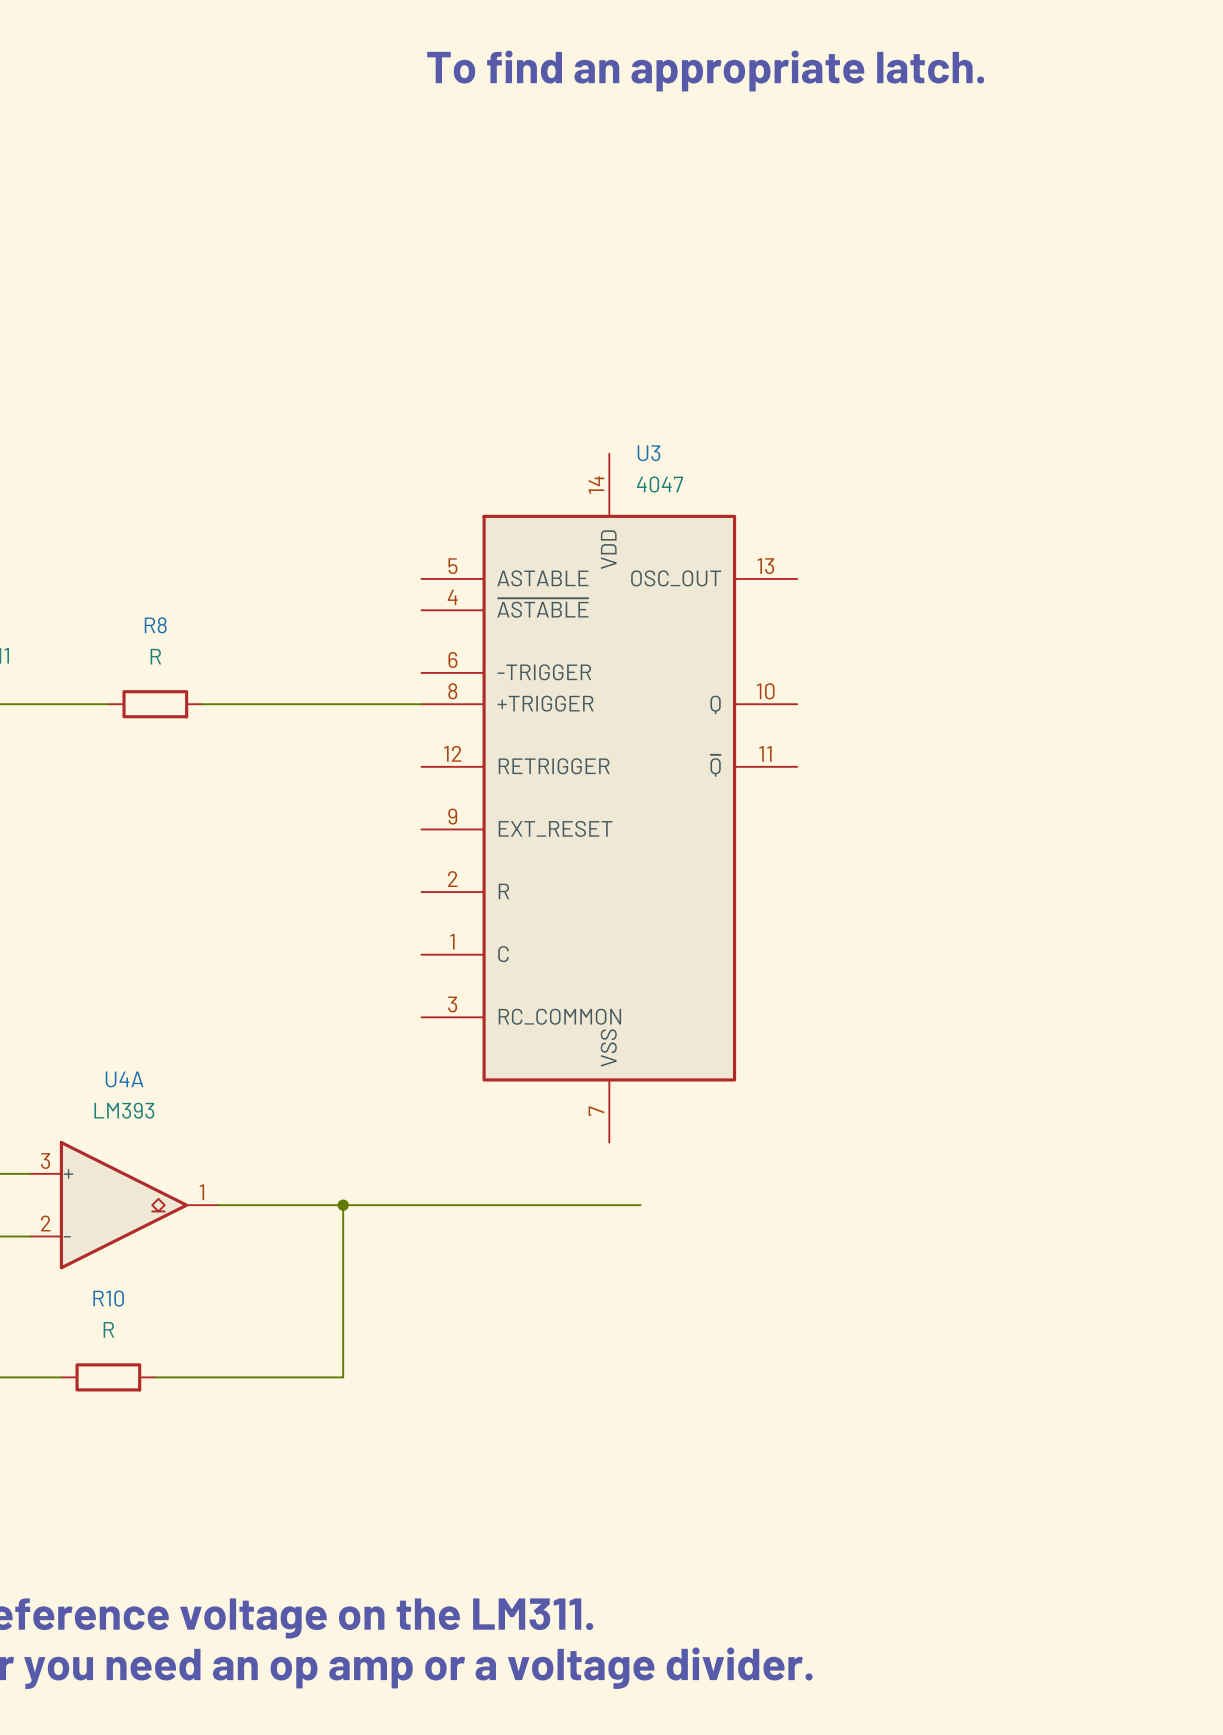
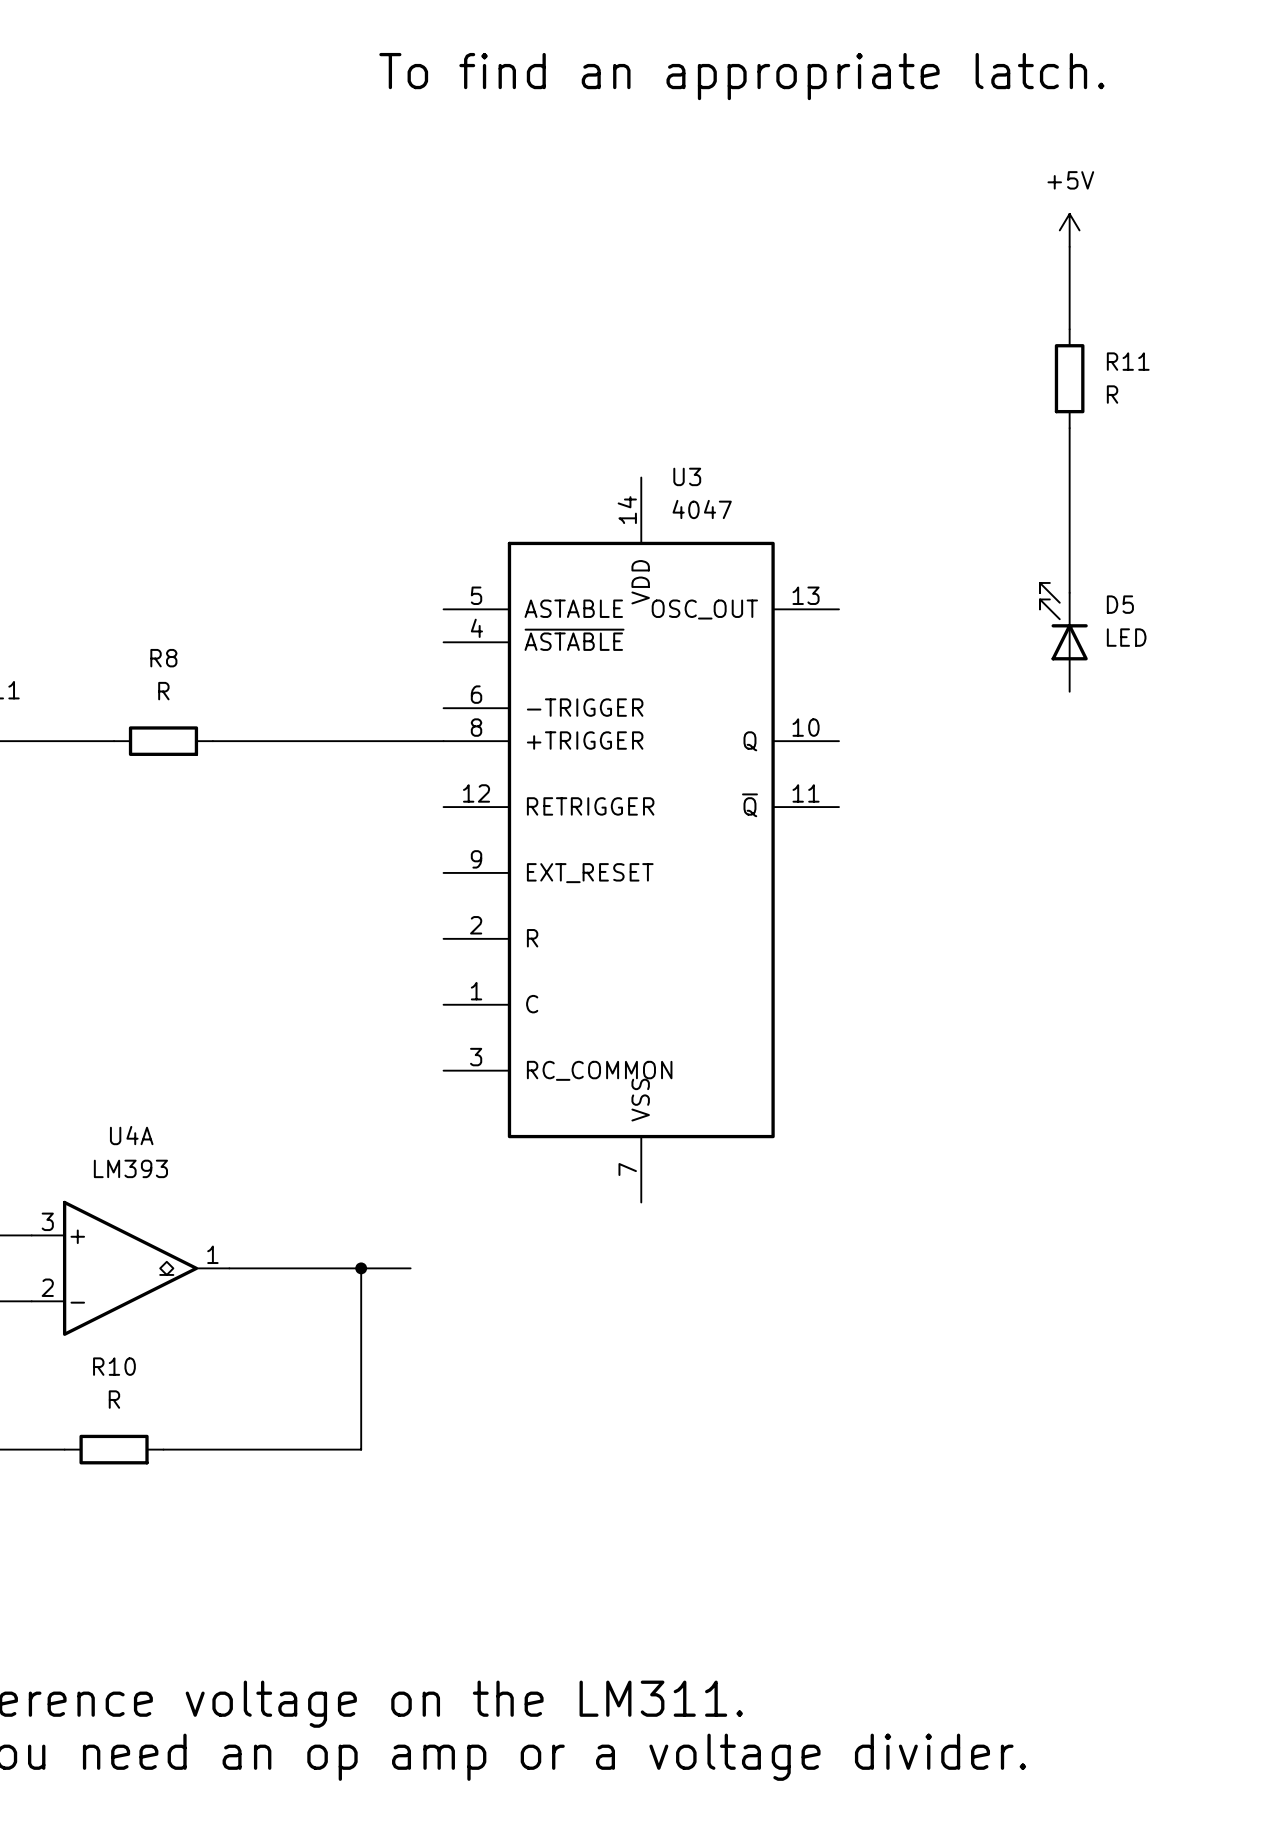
power symbol: none -> +5V (1069, 230)
wire: none -> (1069, 246) (1069, 329)
R11: none -> R (1069, 378)
wire: none -> (1069, 428) (1069, 592)
D5: none -> LED (1063, 637)
wire: (390, 1205) (640, 1205) -> none

